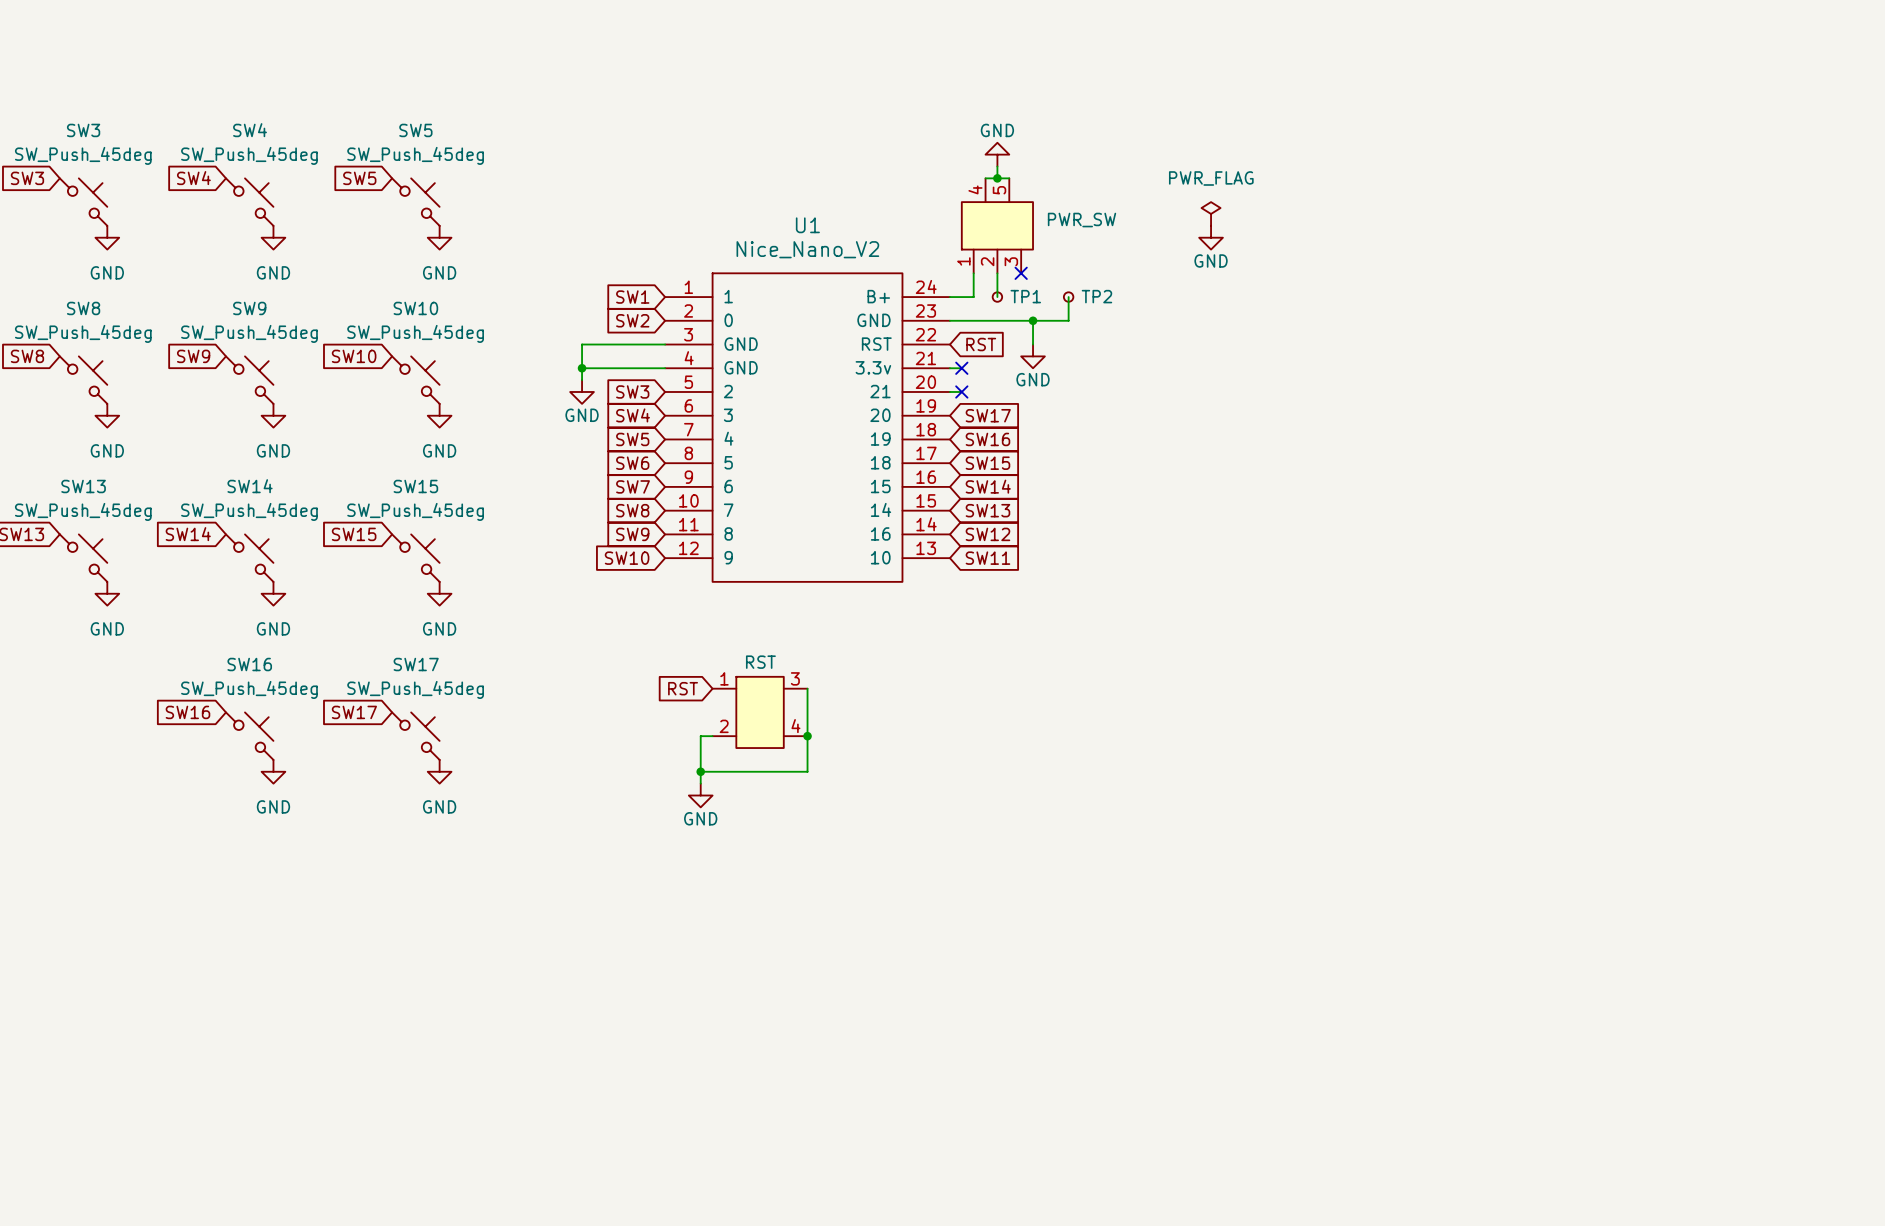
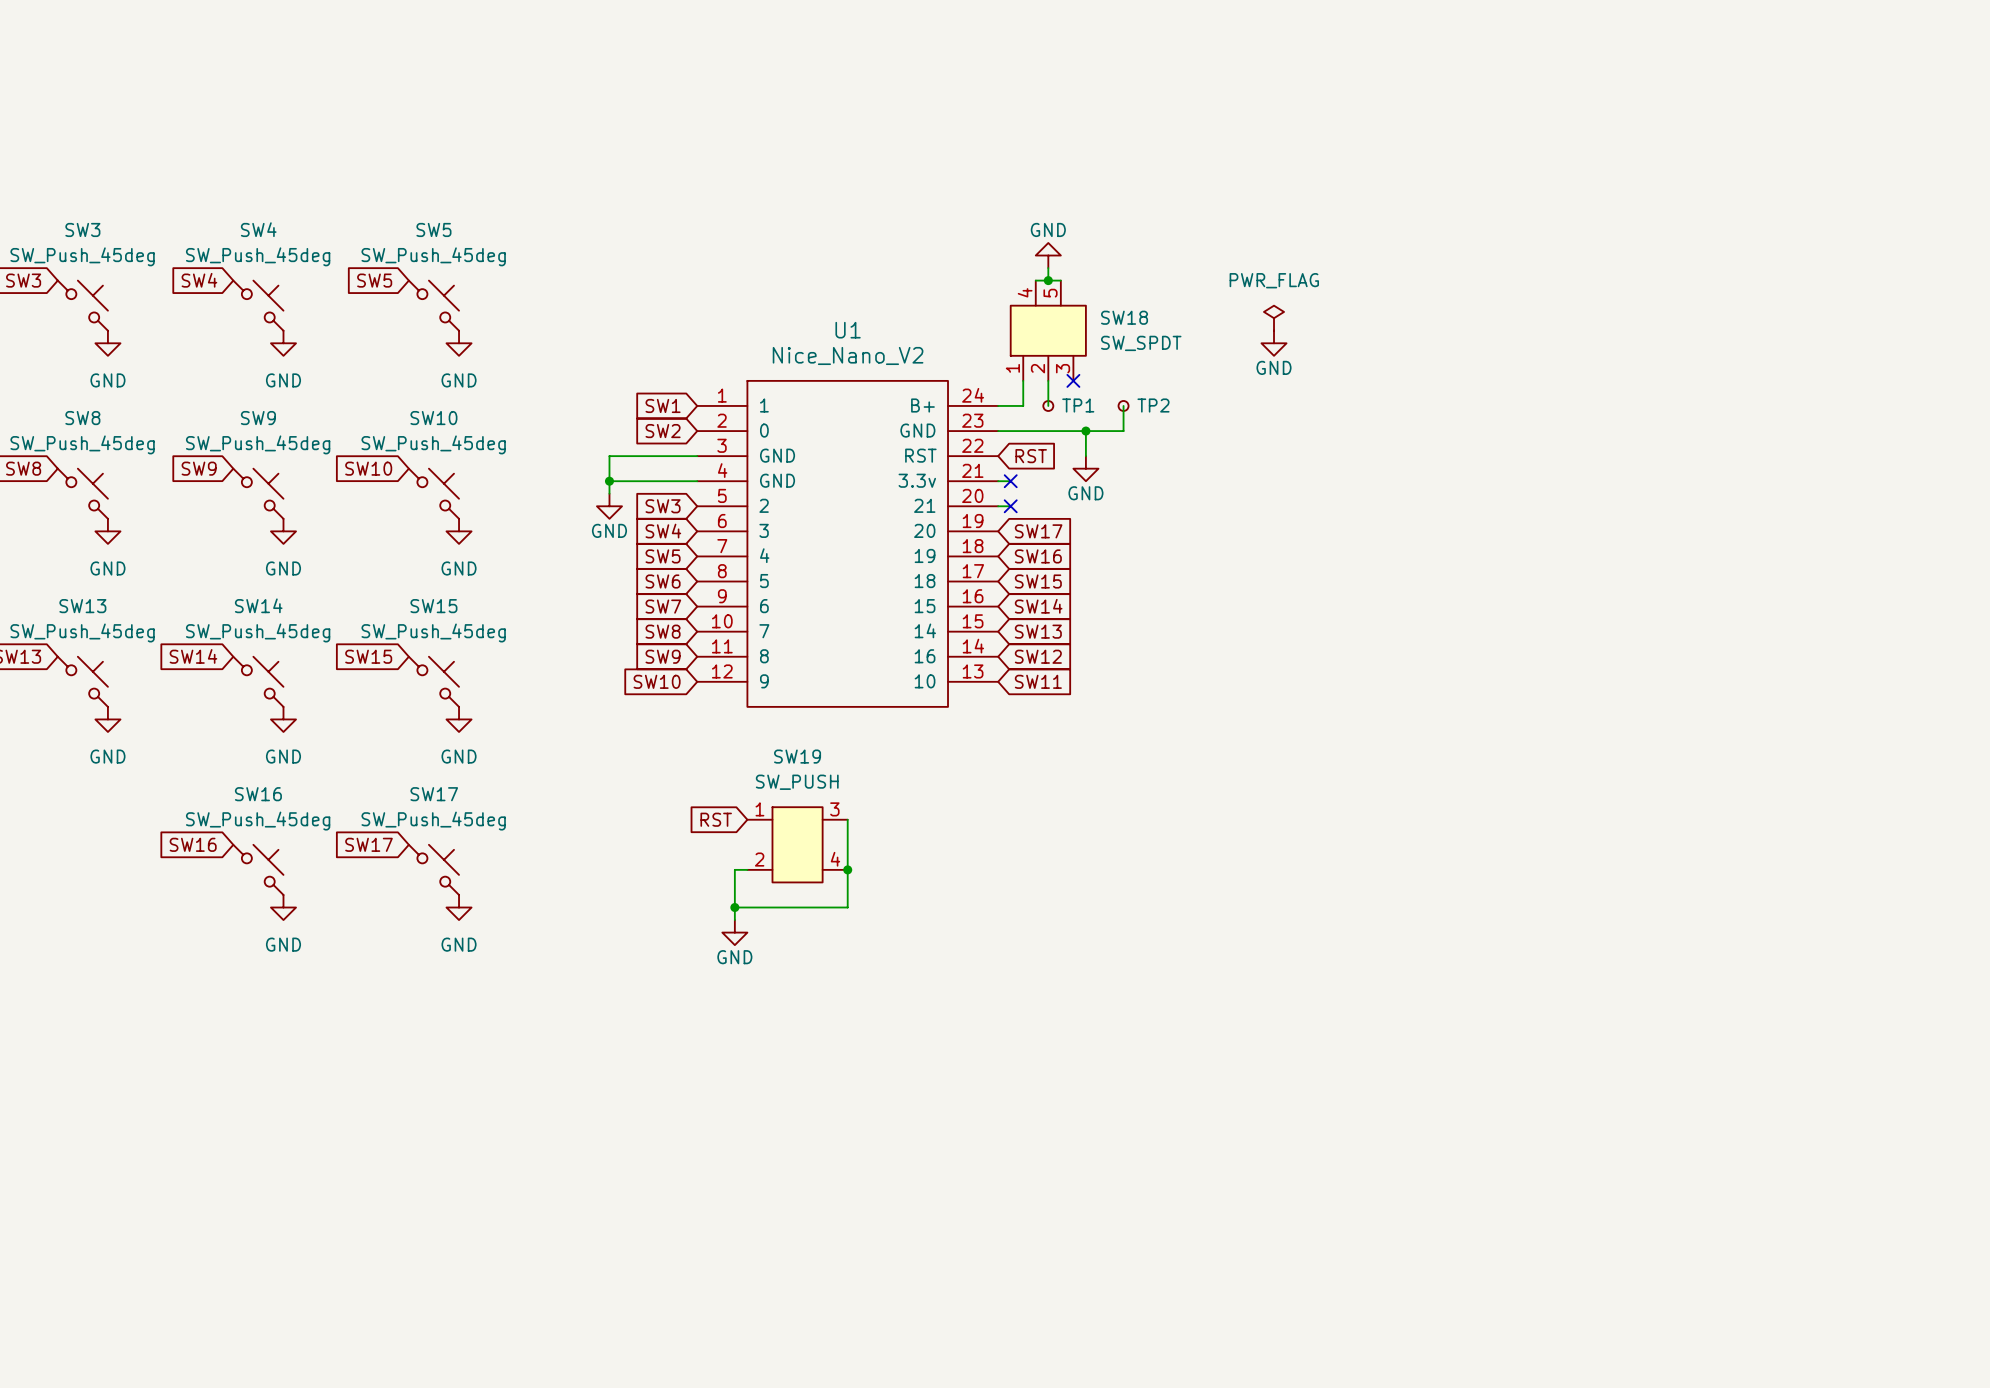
PWR_SW name: PWR_SW (1081, 220) -> SW18 (1124, 317)
PWR_SW value: none -> SW_SPDT (1141, 343)
RST value: none -> SW_PUSH (797, 782)
RST name: RST (760, 662) -> SW19 (797, 756)

